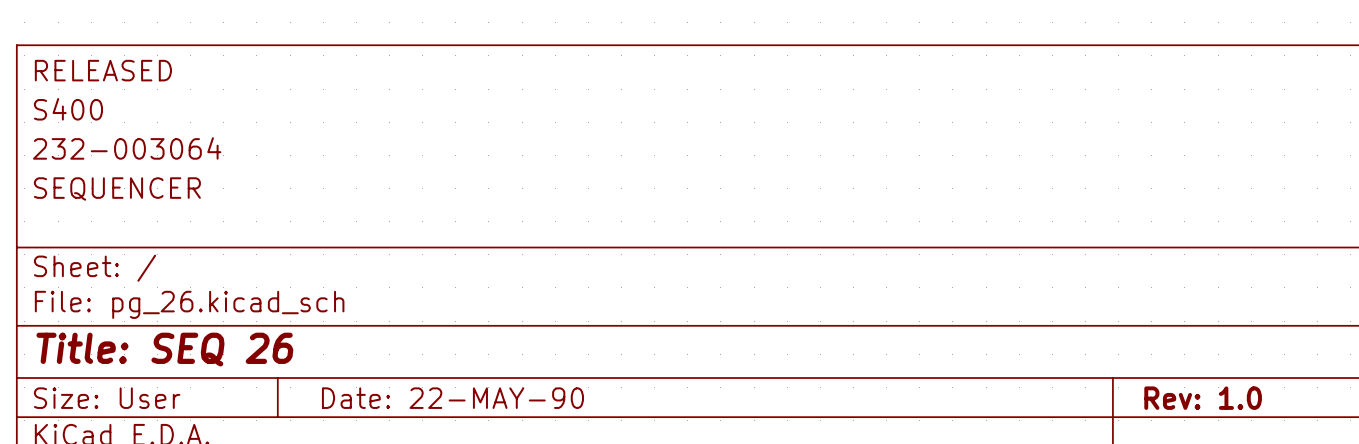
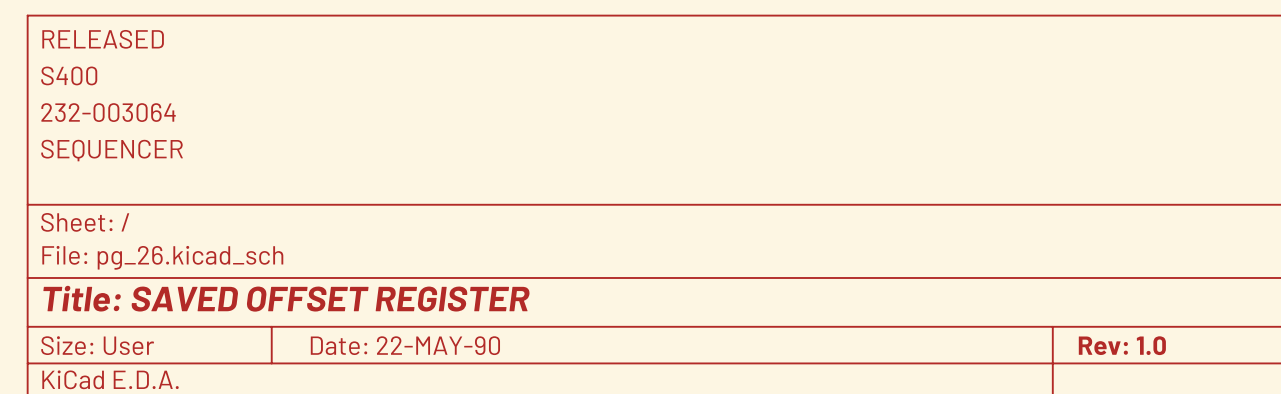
title block: Title: SEQ 26 (164, 349) -> Title: SAVED OFFSET REGISTER (286, 298)

